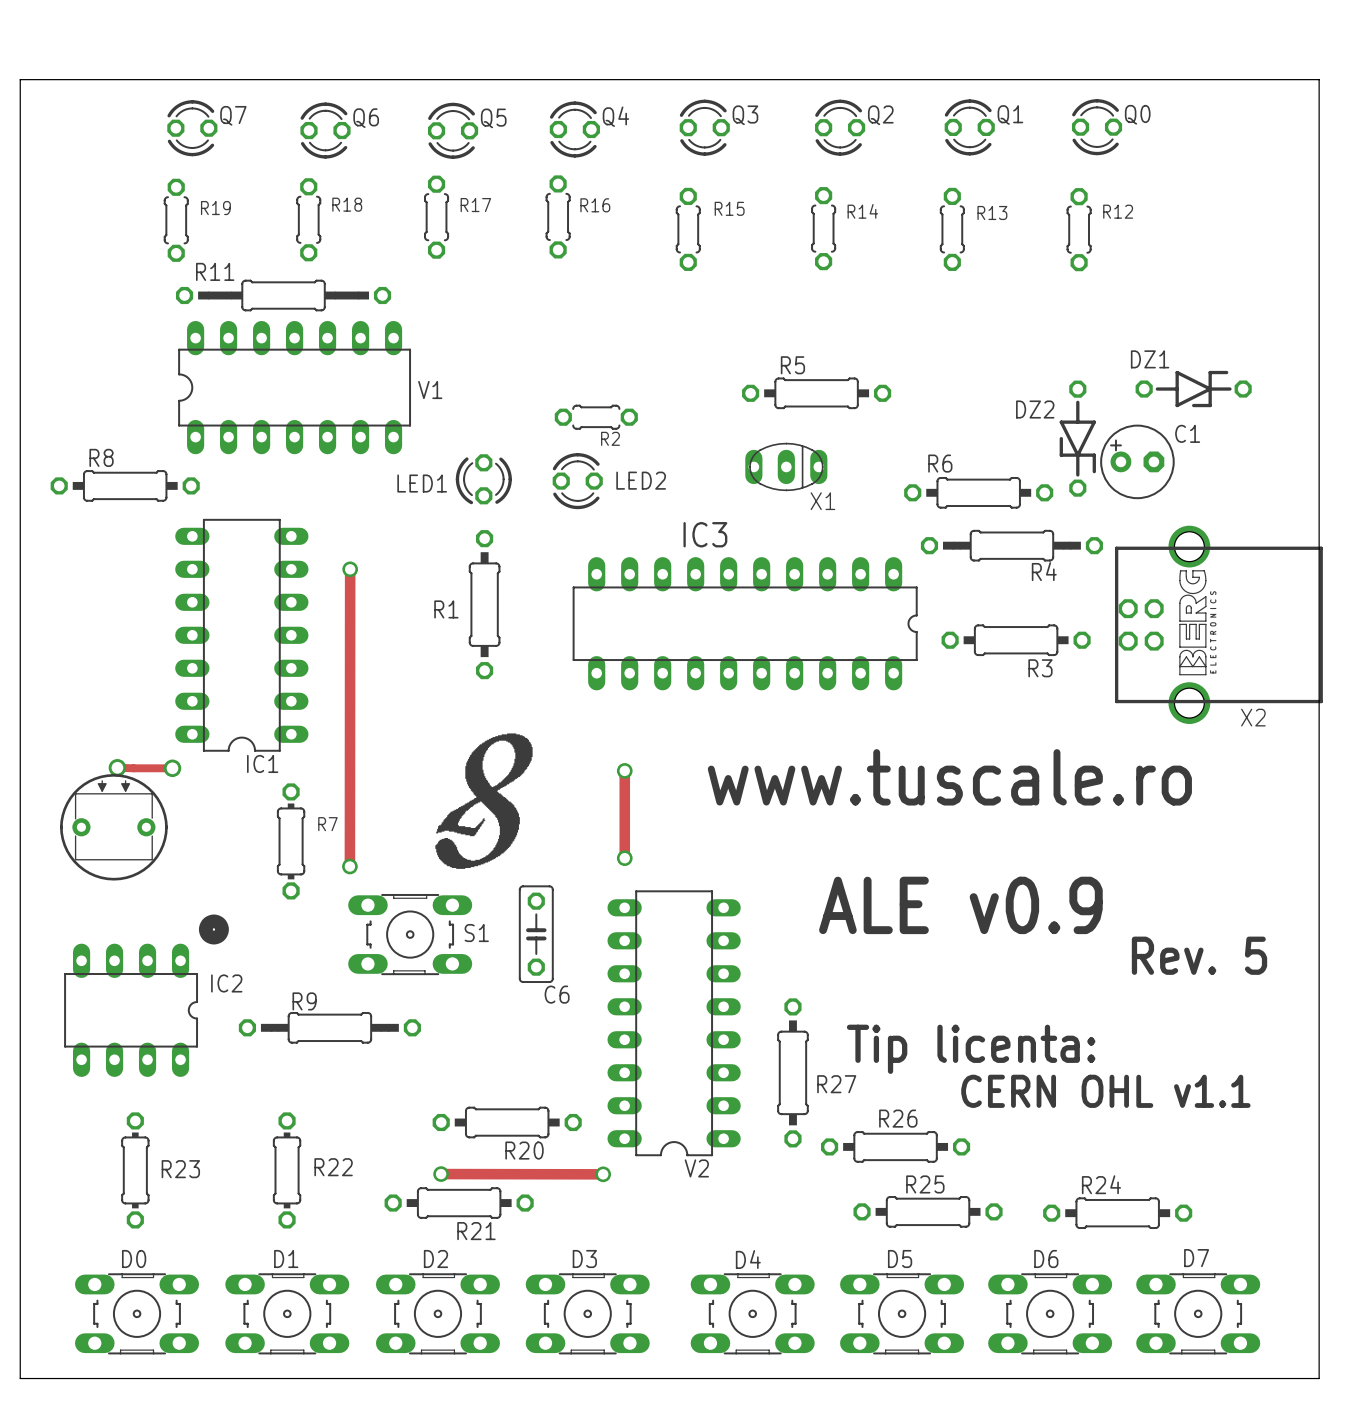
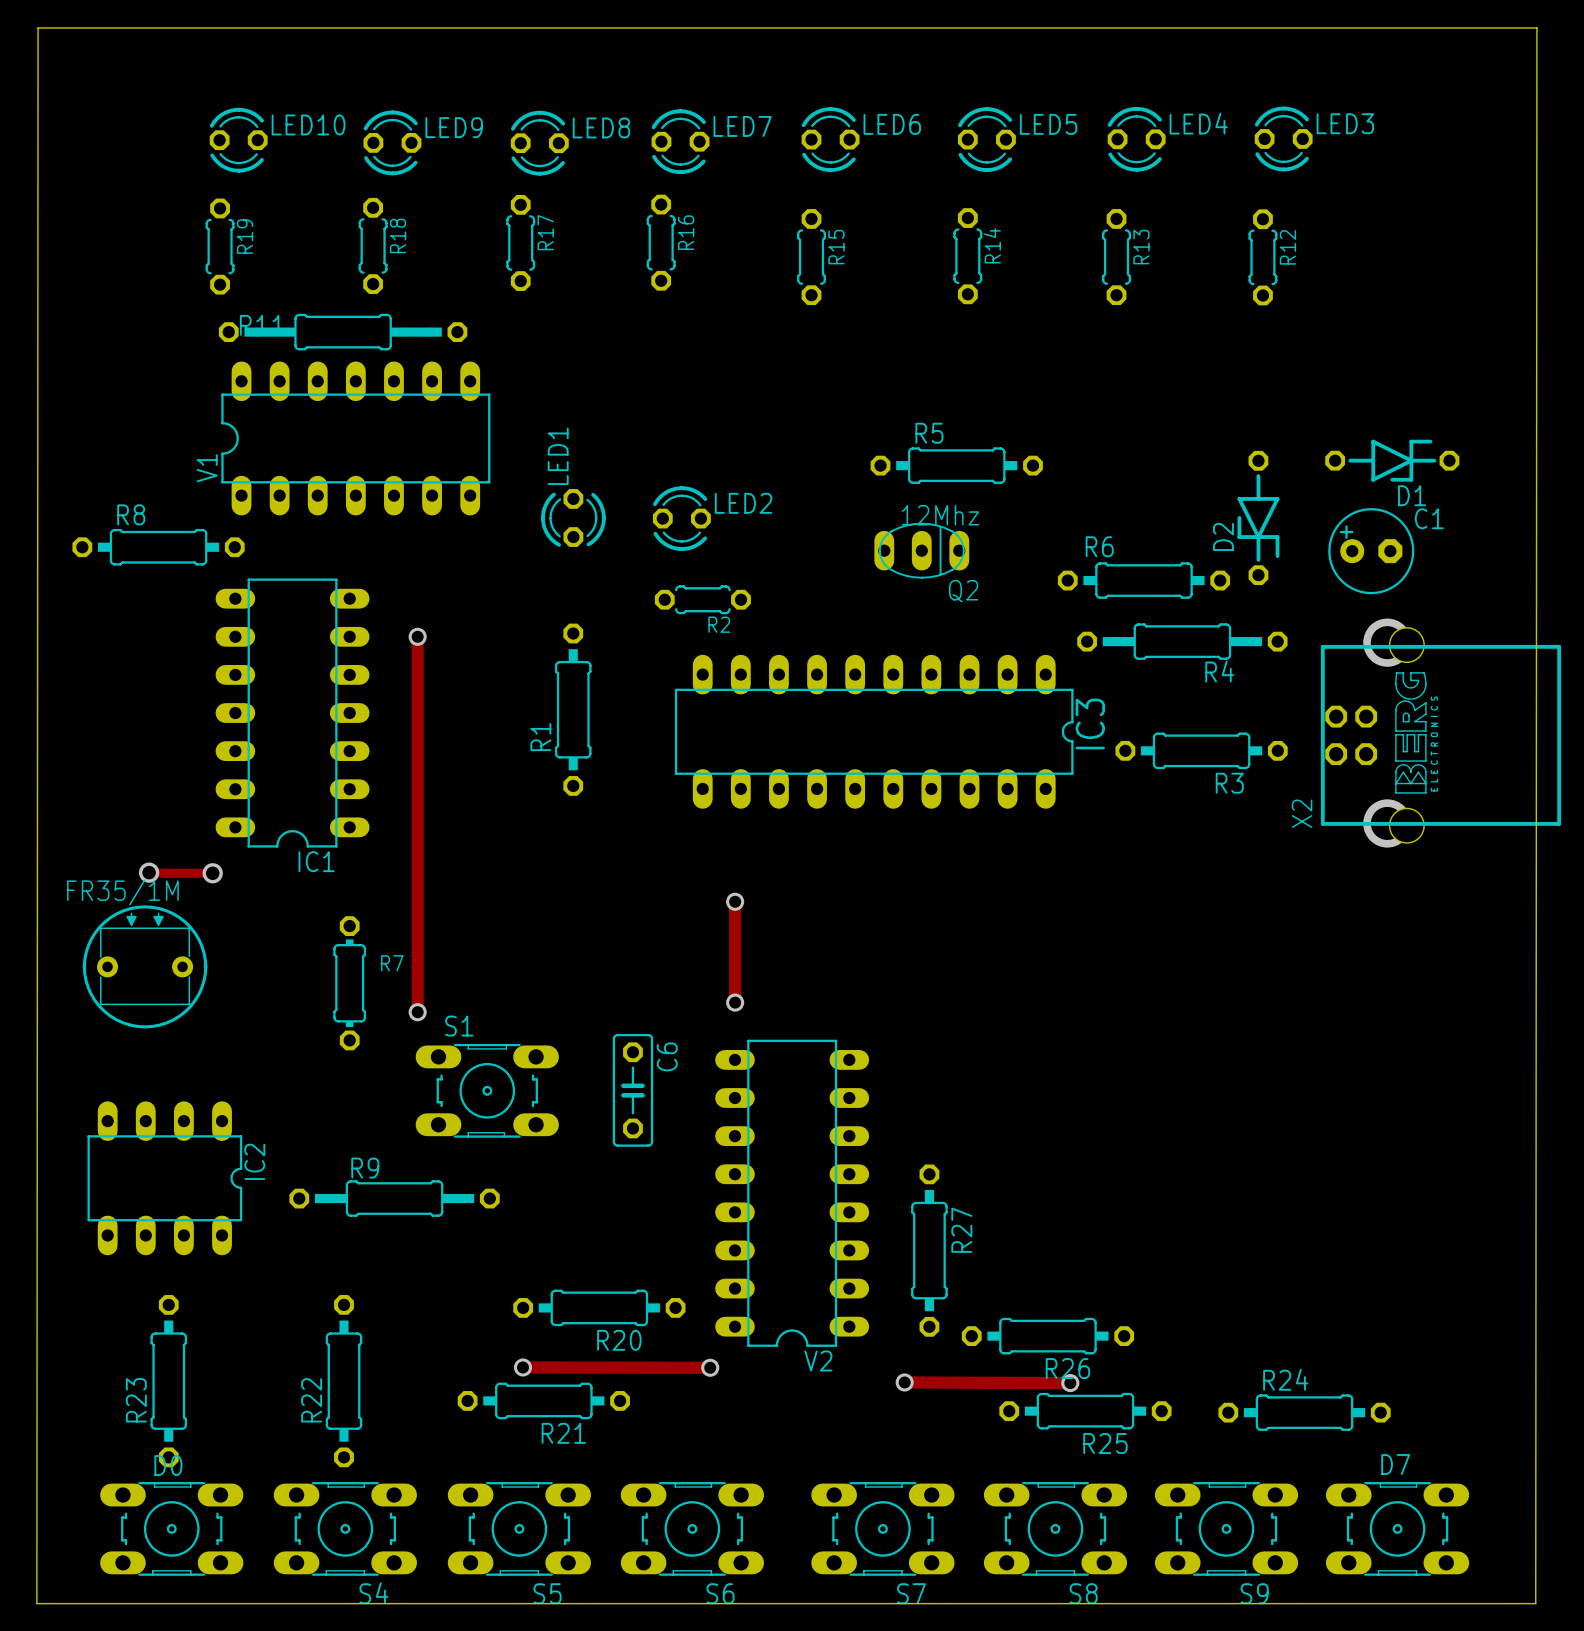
LED4: none -> (1136, 139)
LED3: none -> (1283, 138)
LED10: none -> (238, 140)
LED6: none -> (830, 139)
LED5: none -> (986, 139)
LED7: none -> (680, 141)
LED9: none -> (392, 142)
LED8: none -> (539, 143)
Q3: (704, 127) -> none
Q2: (840, 127) -> none
Q1: (969, 127) -> none
Q0: (1097, 127) -> none
Q7: (192, 128) -> none
Q4: (574, 129) -> none
Q6: (325, 130) -> none
Q5: (453, 130) -> none
R18 name rotation: 0° (347, 204) -> 90° counterclockwise (398, 235)
R17 name rotation: 0° (475, 205) -> 90° counterclockwise (545, 232)
R16 name rotation: 0° (595, 205) -> 90° counterclockwise (686, 232)
R19 name rotation: 0° (215, 208) -> 90° counterclockwise (245, 236)
R15 name rotation: 0° (729, 208) -> 90° counterclockwise (836, 247)
R14 name rotation: 0° (862, 211) -> 90° counterclockwise (992, 245)
R12 name rotation: 0° (1118, 211) -> 90° counterclockwise (1287, 247)
R13 name rotation: 0° (992, 212) -> 90° counterclockwise (1141, 247)
R16 position: (558, 216) -> (661, 242)
R17 position: (436, 217) -> (520, 242)
R18 position: (308, 219) -> (373, 245)
R19 position: (176, 220) -> (220, 246)
R14 position: (823, 228) -> (967, 256)
R15 position: (688, 229) -> (811, 257)
R13 position: (952, 229) -> (1116, 257)
R12 position: (1079, 229) -> (1262, 257)
R11 position: (283, 295) -> (343, 332)
DZ1 name: DZ1 (1150, 359) -> D1 (1412, 495)
V1 position: (294, 387) -> (355, 438)
V1 name rotation: 0° (430, 390) -> 90° counterclockwise (207, 468)
V1 name position: V1 (430, 390) -> V1 (207, 468)
DZ2 name: DZ2 (1035, 409) -> D2 (1223, 536)
R2 position: (596, 417) -> (702, 599)
X1 value: none -> 12Mhz (940, 515)
C1 position: (1137, 461) -> (1371, 551)
LED1 position: (483, 479) -> (573, 517)
LED2 name position: LED2 (641, 480) -> LED2 (743, 503)
LED2 position: (577, 481) -> (681, 518)
LED1 name rotation: 0° (422, 483) -> 90° counterclockwise (558, 456)
LED1 name position: LED1 (422, 483) -> LED1 (558, 456)
R8 position: (125, 485) -> (158, 547)
X1 name: X1 (822, 501) -> Q2 (963, 591)
IC3 name rotation: 0° (705, 534) -> 90° counterclockwise (1090, 724)
IC3 name position: IC3 (705, 534) -> IC3 (1090, 724)
track: (350, 569) (349, 866) -> (417, 636) (417, 1012)
via position: (350, 569) -> (417, 636)
R1 name rotation: 0° (446, 609) -> 90° counterclockwise (540, 737)
X2 position: (1218, 624) -> (1440, 735)
IC1 position: (241, 635) -> (292, 713)
R3 position: (1016, 640) -> (1201, 750)
X2 name rotation: 0° (1253, 717) -> 90° counterclockwise (1302, 813)
X2 name position: X2 (1253, 717) -> X2 (1302, 813)
drawing: [435, 733, 533, 869] -> none
FR35/1M name: none -> FR35/1M (122, 892)
track: (117, 767) (172, 768) -> (149, 872) (212, 873)
via position: (117, 767) -> (149, 872)
via position: (172, 768) -> (212, 873)
text: www.tuscale.ro (949, 777) -> none
text: ALE v0.9 (960, 905) -> none
drawing: [198, 914, 229, 945] -> none
S1 name position: S1 (476, 933) -> S1 (459, 1026)
text: Rev. 5 (1199, 955) -> none
IC2 name rotation: 0° (226, 983) -> 90° counterclockwise (254, 1161)
C6 name rotation: 0° (557, 994) -> 90° counterclockwise (667, 1056)
C6 name position: C6 (557, 994) -> C6 (667, 1056)
text: Tip licenta: (971, 1049) -> none
R27 name rotation: 0° (836, 1084) -> 90° counterclockwise (961, 1230)
text: CERN OHL v1.1 (1105, 1091) -> none
R23 footprint: [121, 1112, 150, 1229] -> [150, 1295, 188, 1468]
R22 footprint: [272, 1112, 302, 1229] -> [325, 1295, 363, 1468]
R26 name position: R26 (898, 1118) -> R26 (1067, 1368)
R22 name position: R22 (333, 1167) -> R22 (311, 1400)
R23 name position: R23 (180, 1169) -> R23 (136, 1400)
R25 name position: R25 (925, 1184) -> R25 (1105, 1443)
track: none -> (904, 1382) (1070, 1383)
via: none -> (904, 1382)
via: none -> (1070, 1383)
D1 name: D1 (286, 1259) -> S4 (373, 1593)
D2 name: D2 (435, 1259) -> S5 (547, 1593)
D3 name: D3 (584, 1259) -> S6 (720, 1593)
D4 name: D4 (748, 1259) -> S7 (911, 1593)
D5 name: D5 (900, 1259) -> S8 (1083, 1593)
D6 name: D6 (1046, 1259) -> S9 (1254, 1593)
board edge: (20, 1378) (20, 79) (1319, 79) (1317, 1378) -> (36, 1603) (38, 27) (1536, 27) (1535, 1603)

